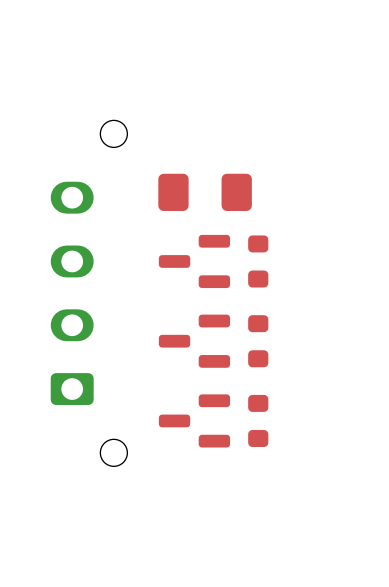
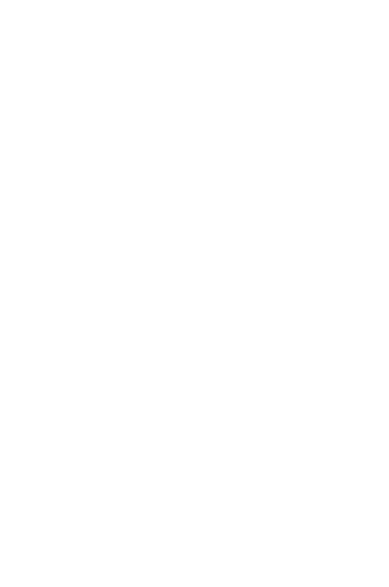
part: (205, 192) -> none
part: (194, 261) -> none
part: (258, 261) -> none
part: (89, 293) -> none
part: (194, 341) -> none
part: (258, 341) -> none
part: (194, 420) -> none
part: (258, 420) -> none

